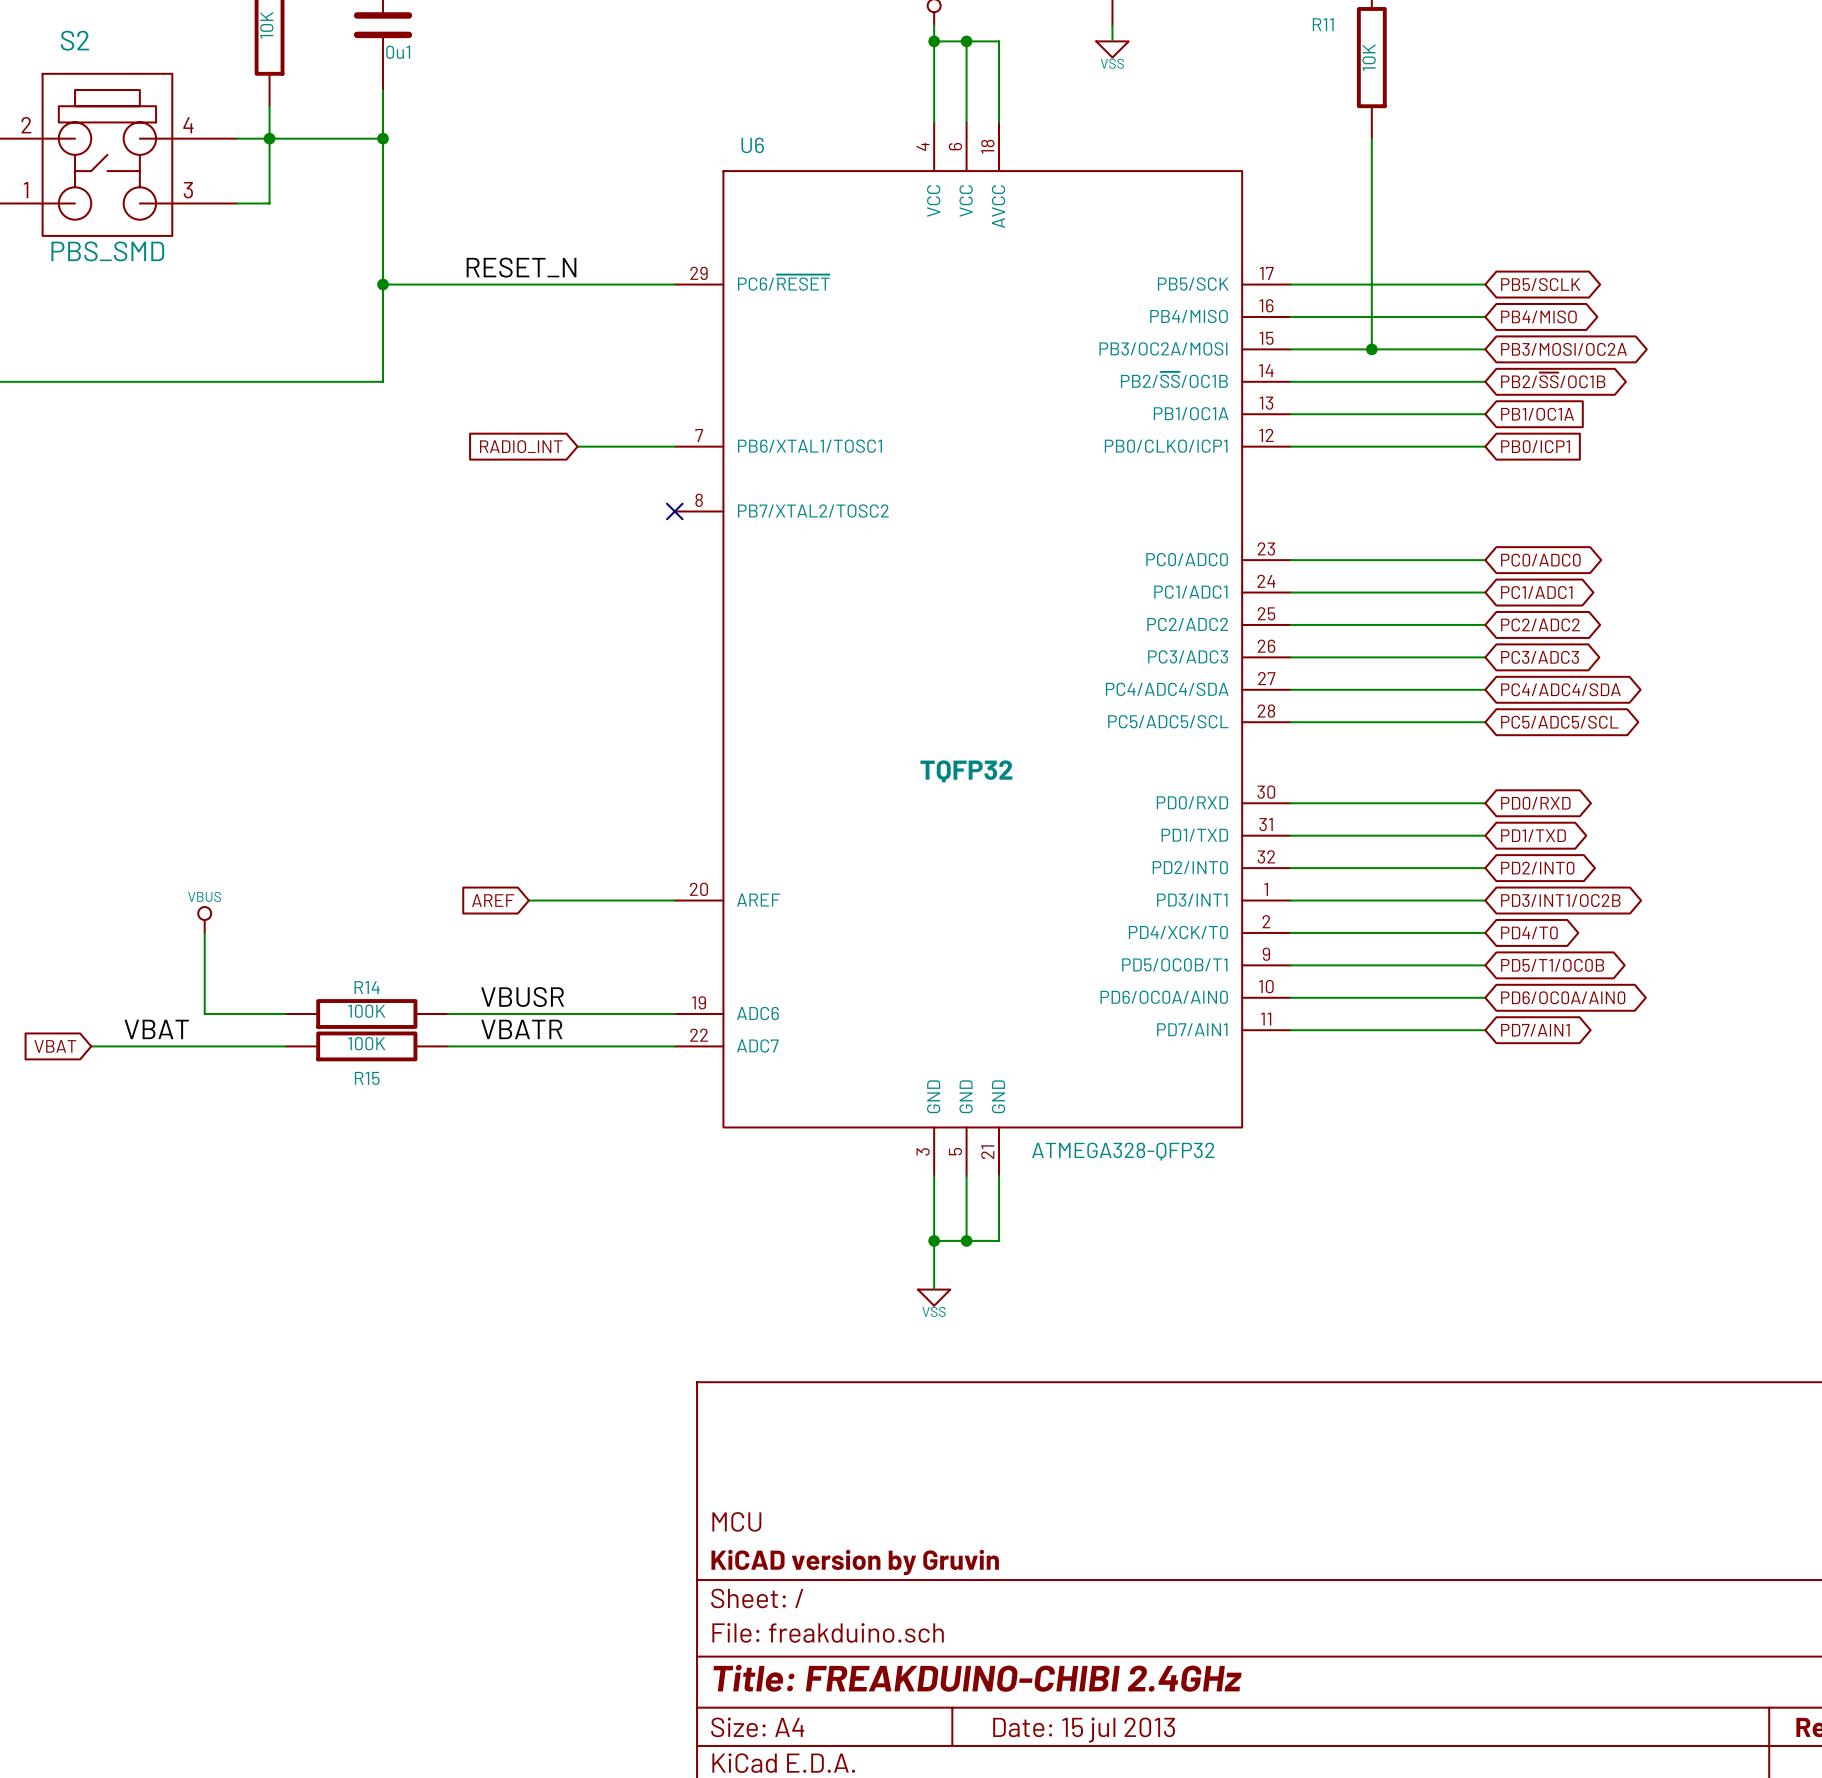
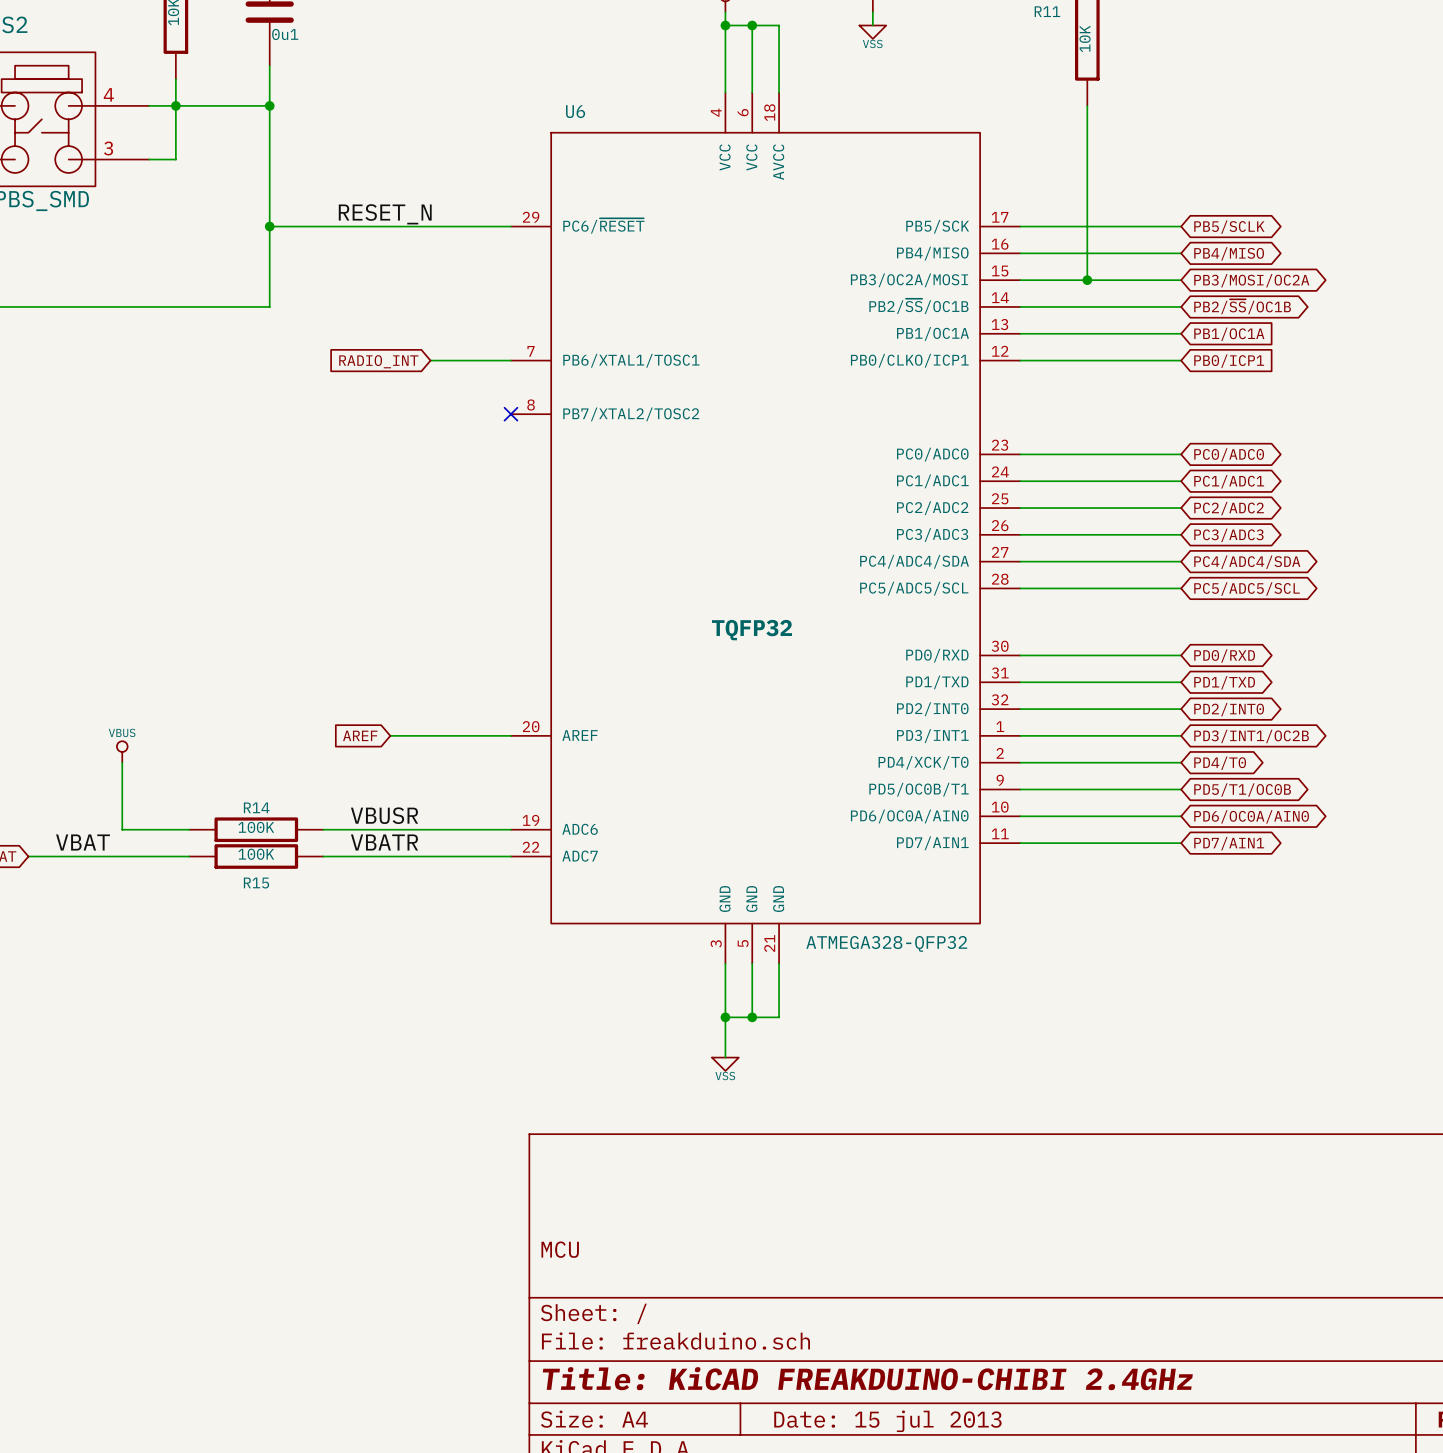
title block: KiCAD version by Gruvin (855, 1562) -> none
title block: Title: FREAKDUINO-CHIBI 2.4GHz (977, 1678) -> Title: KiCAD FREAKDUINO-CHIBI 2.4GHz (867, 1378)

